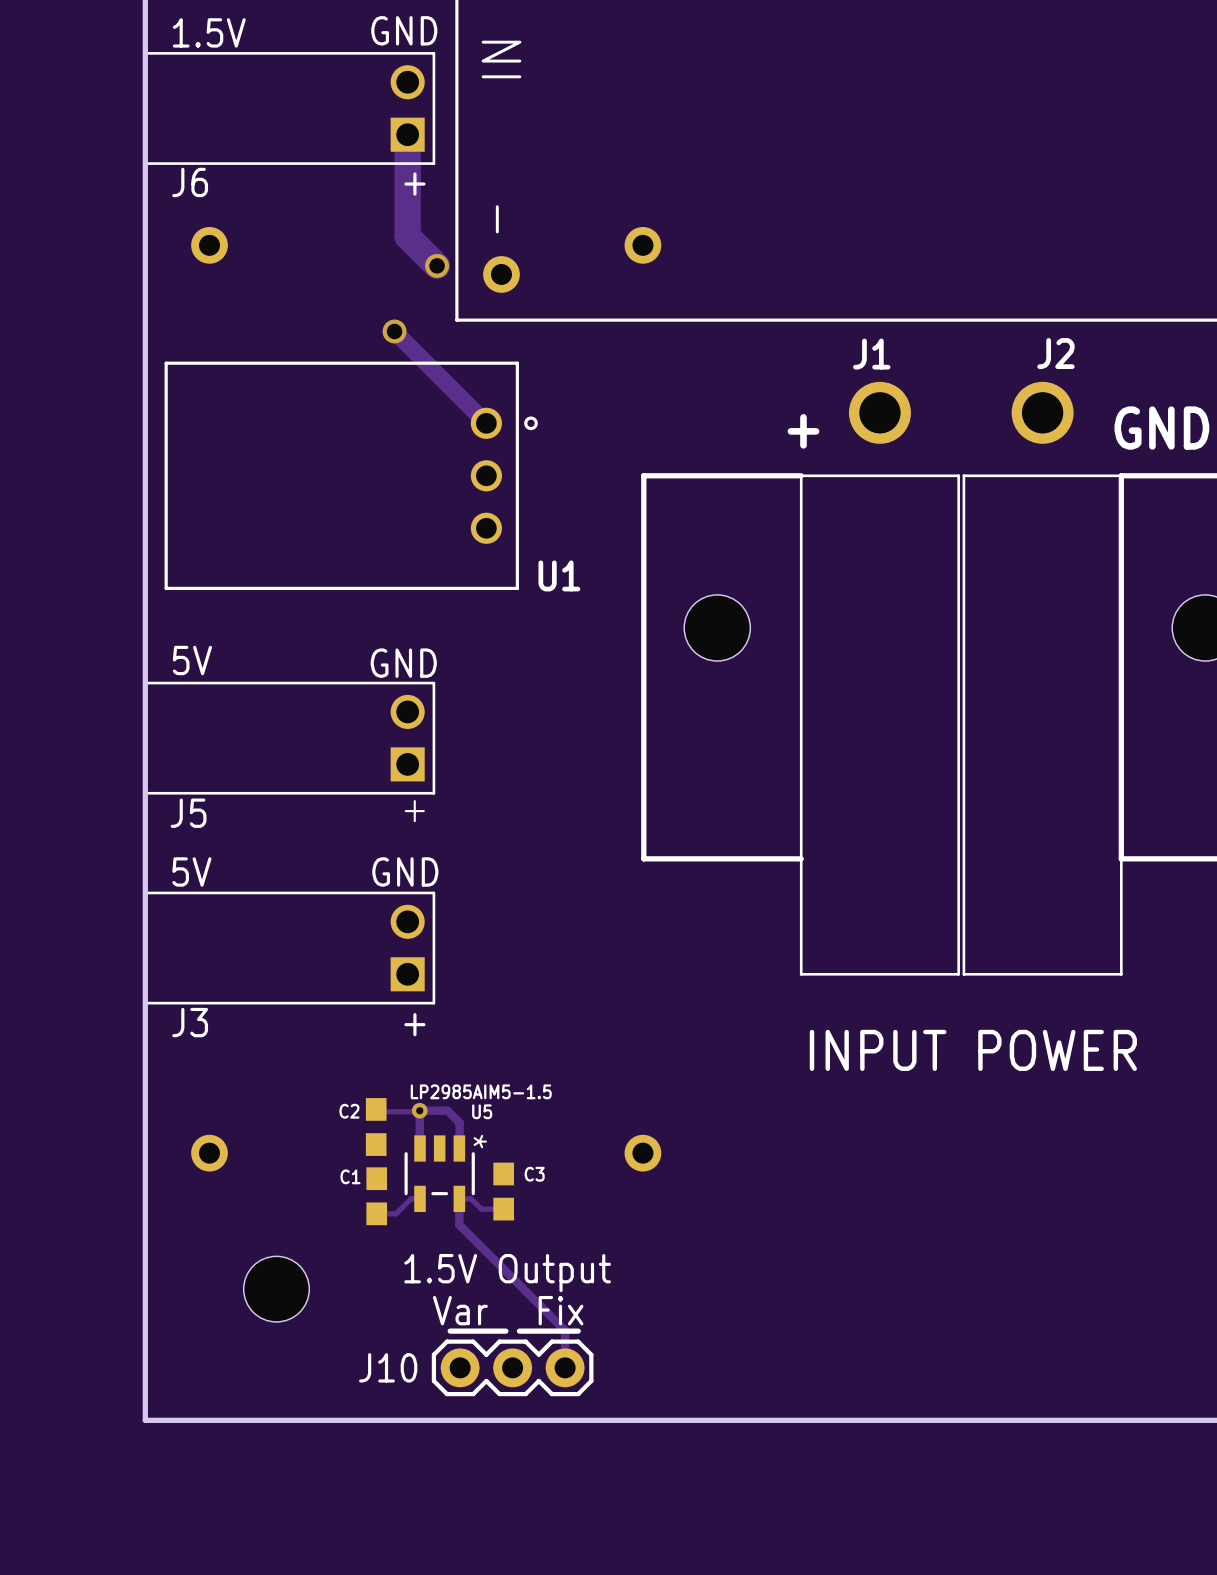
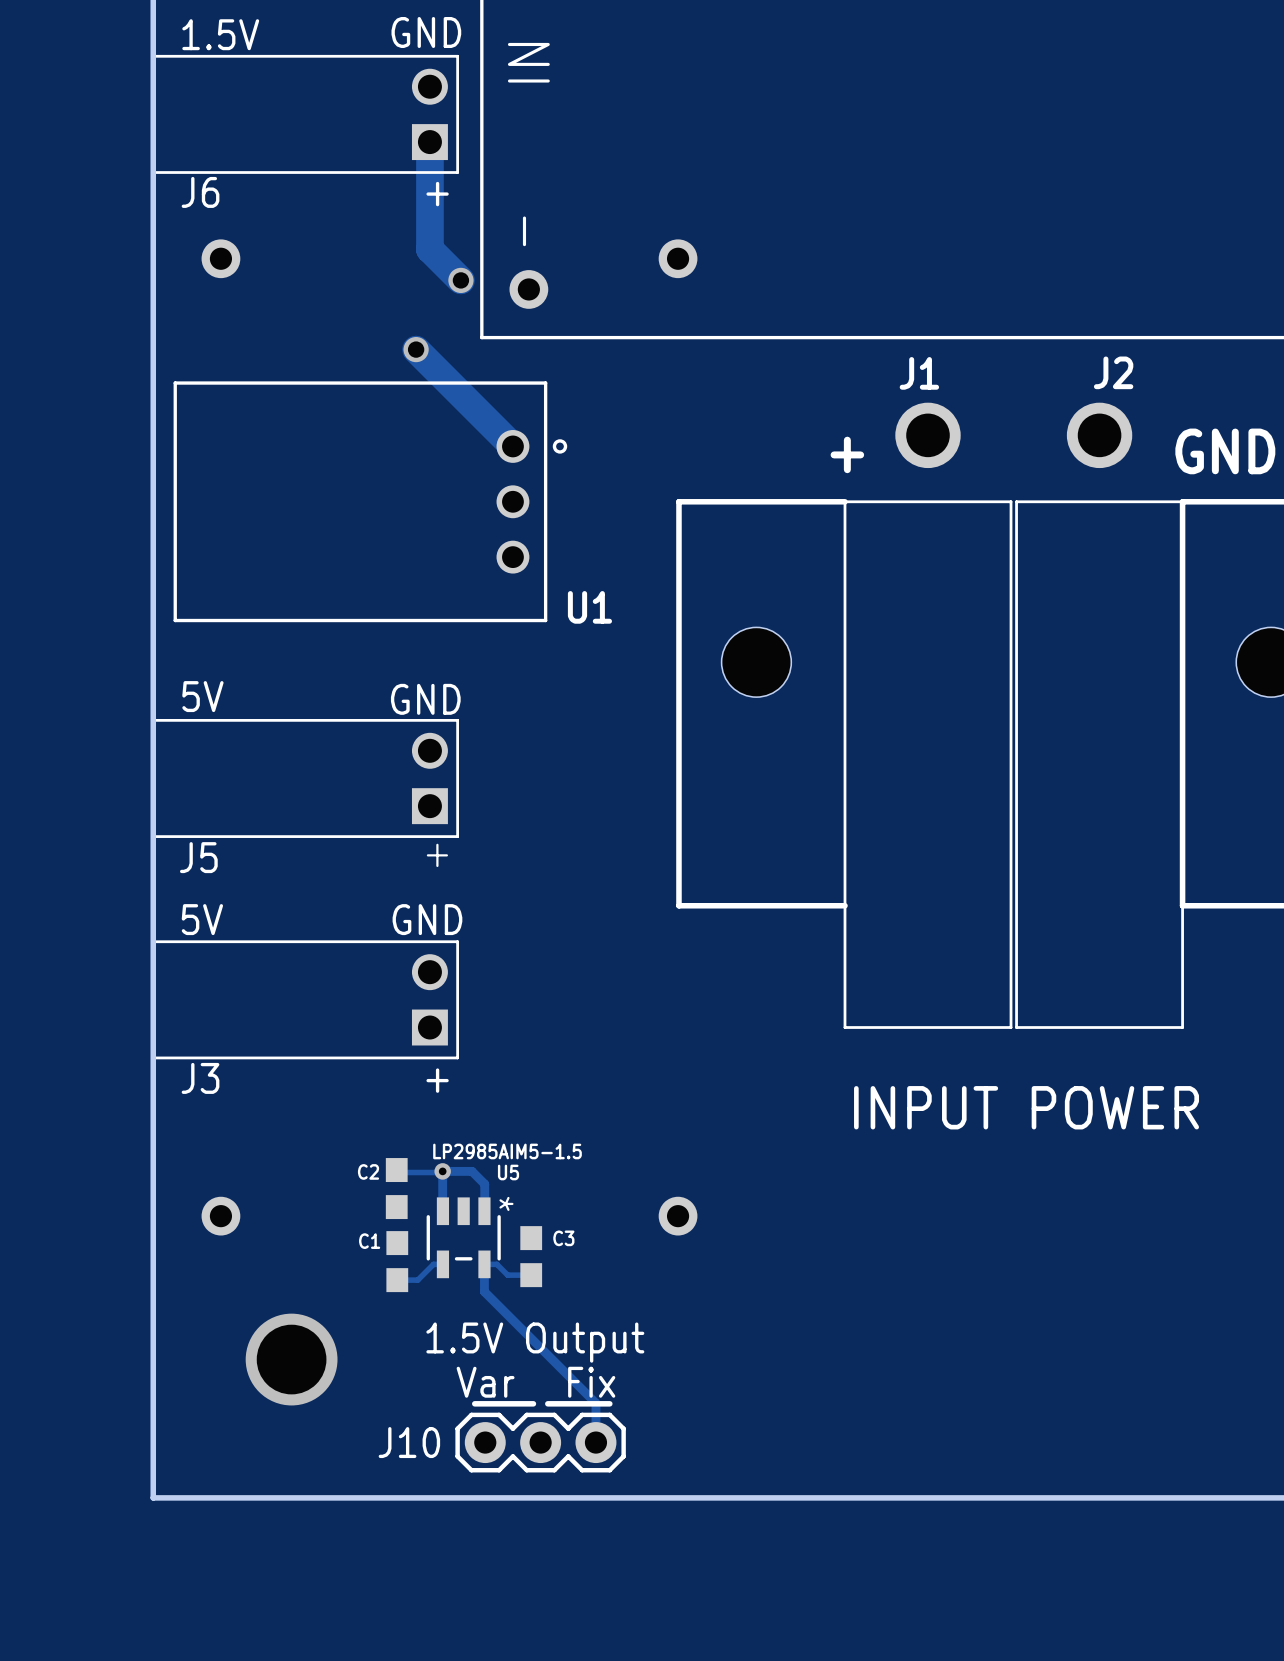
track width: thin (394, 331) (486, 423) -> thick (416, 349) (512, 446)
hole: (276, 1289) -> none
via: none -> (291, 1359)

